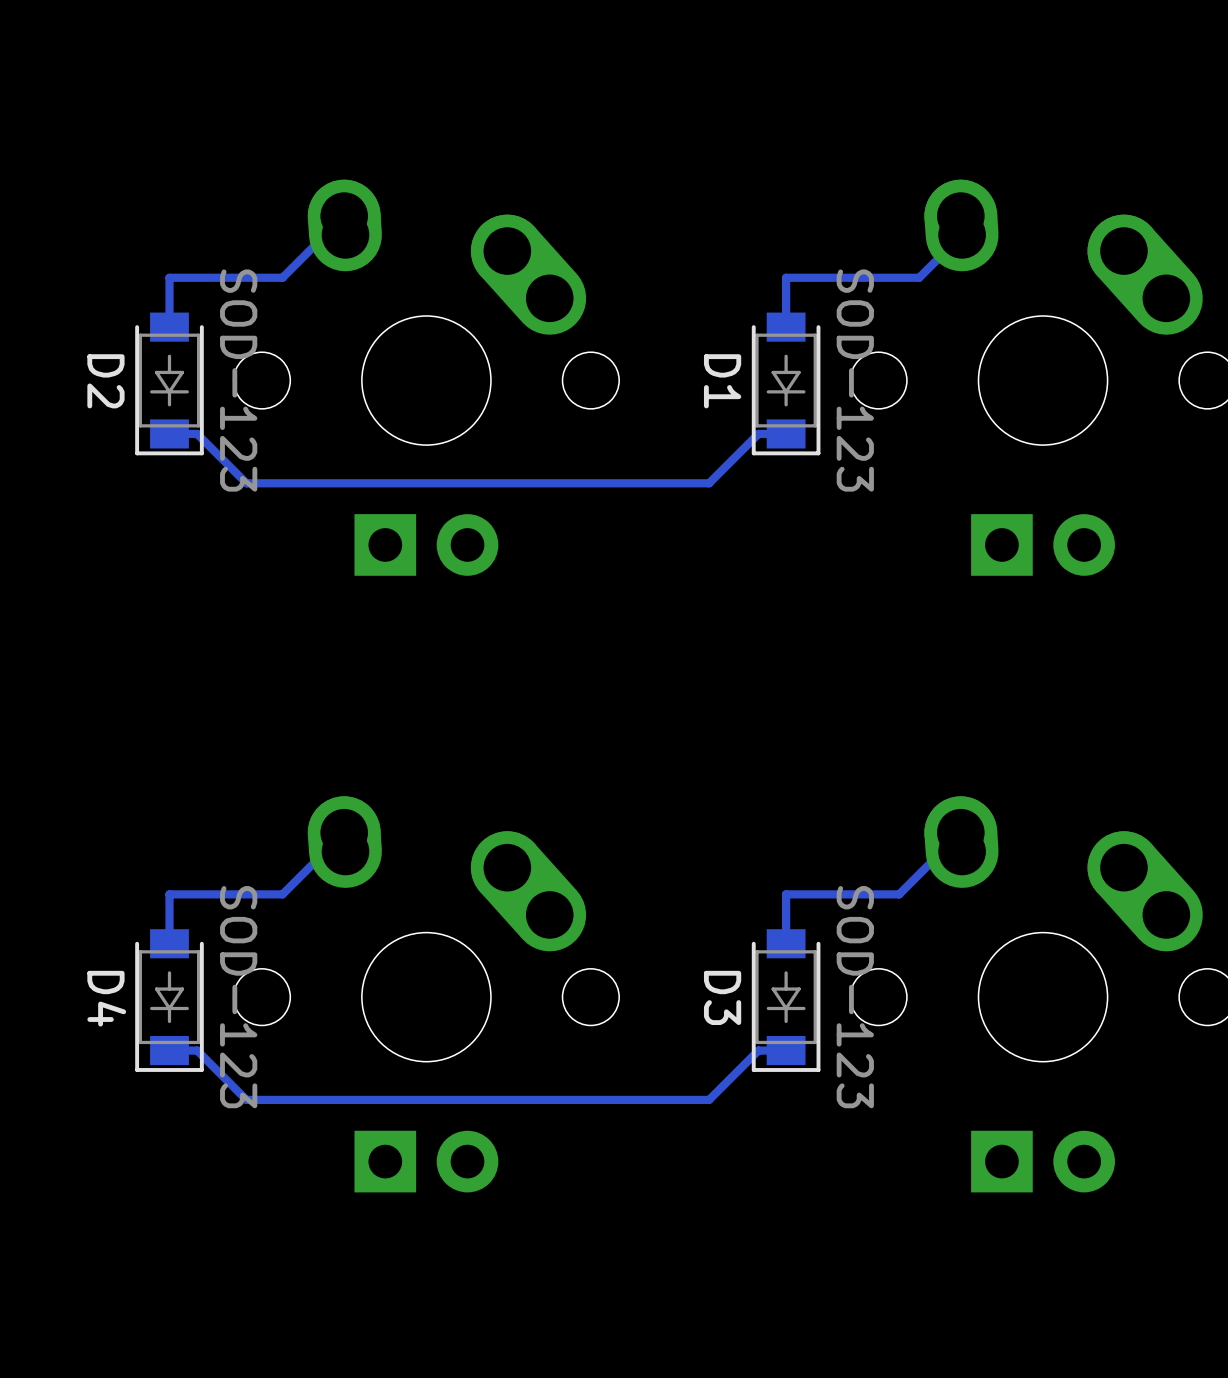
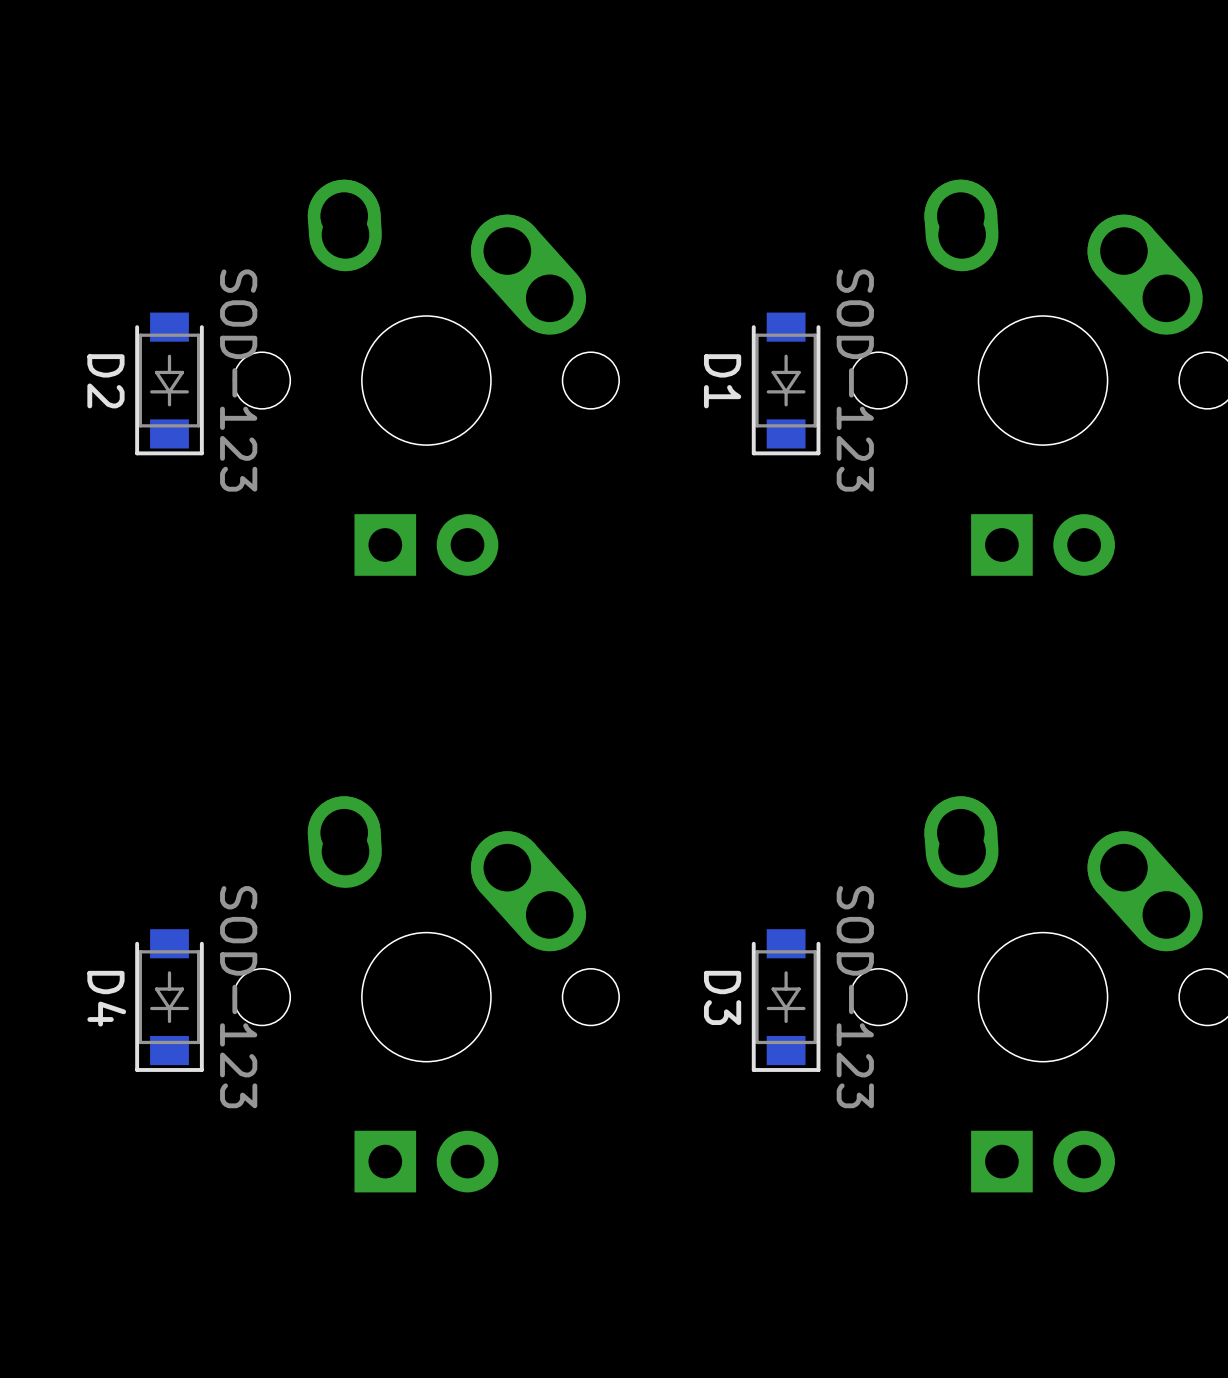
track: (345, 234) (325, 234) (282, 277) (169, 277) (169, 327) -> none
track: (962, 234) (919, 277) (786, 277) (786, 327) -> none
track: (786, 433) (758, 433) (709, 483) (246, 483) (197, 433) (169, 433) -> none
track: (344, 832) (282, 894) (169, 894) (169, 943) -> none
track: (960, 832) (899, 894) (786, 894) (786, 943) (790, 943) -> none
track: (786, 1050) (758, 1050) (709, 1099) (246, 1099) (197, 1050) (169, 1050) -> none

